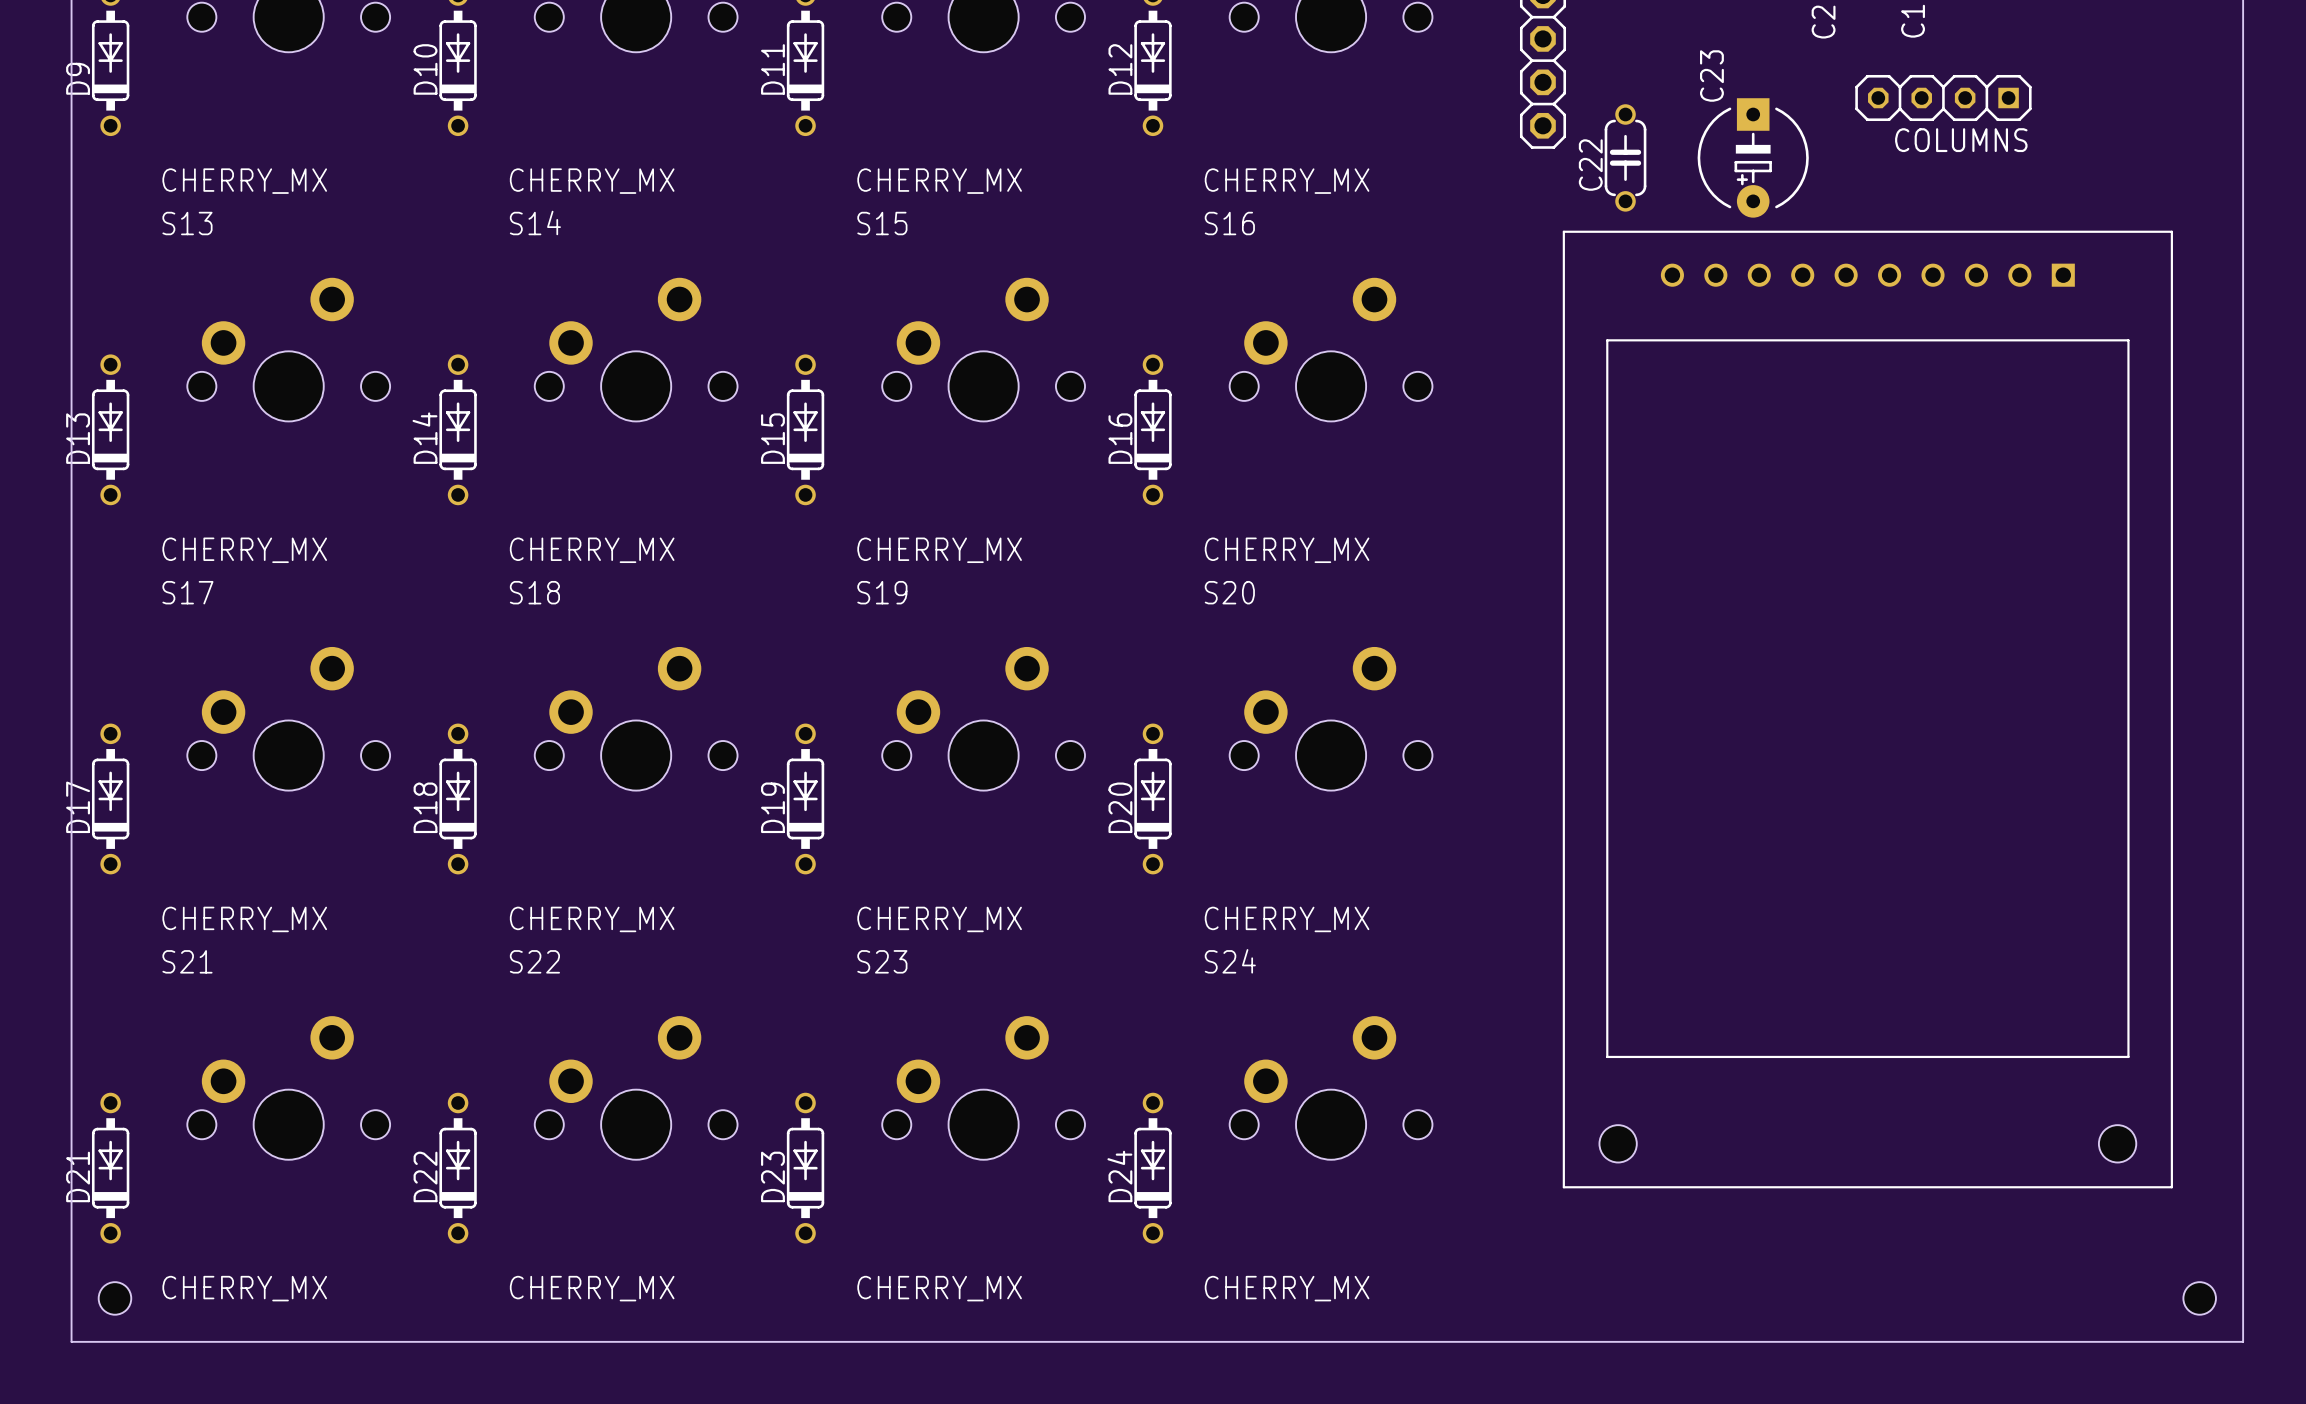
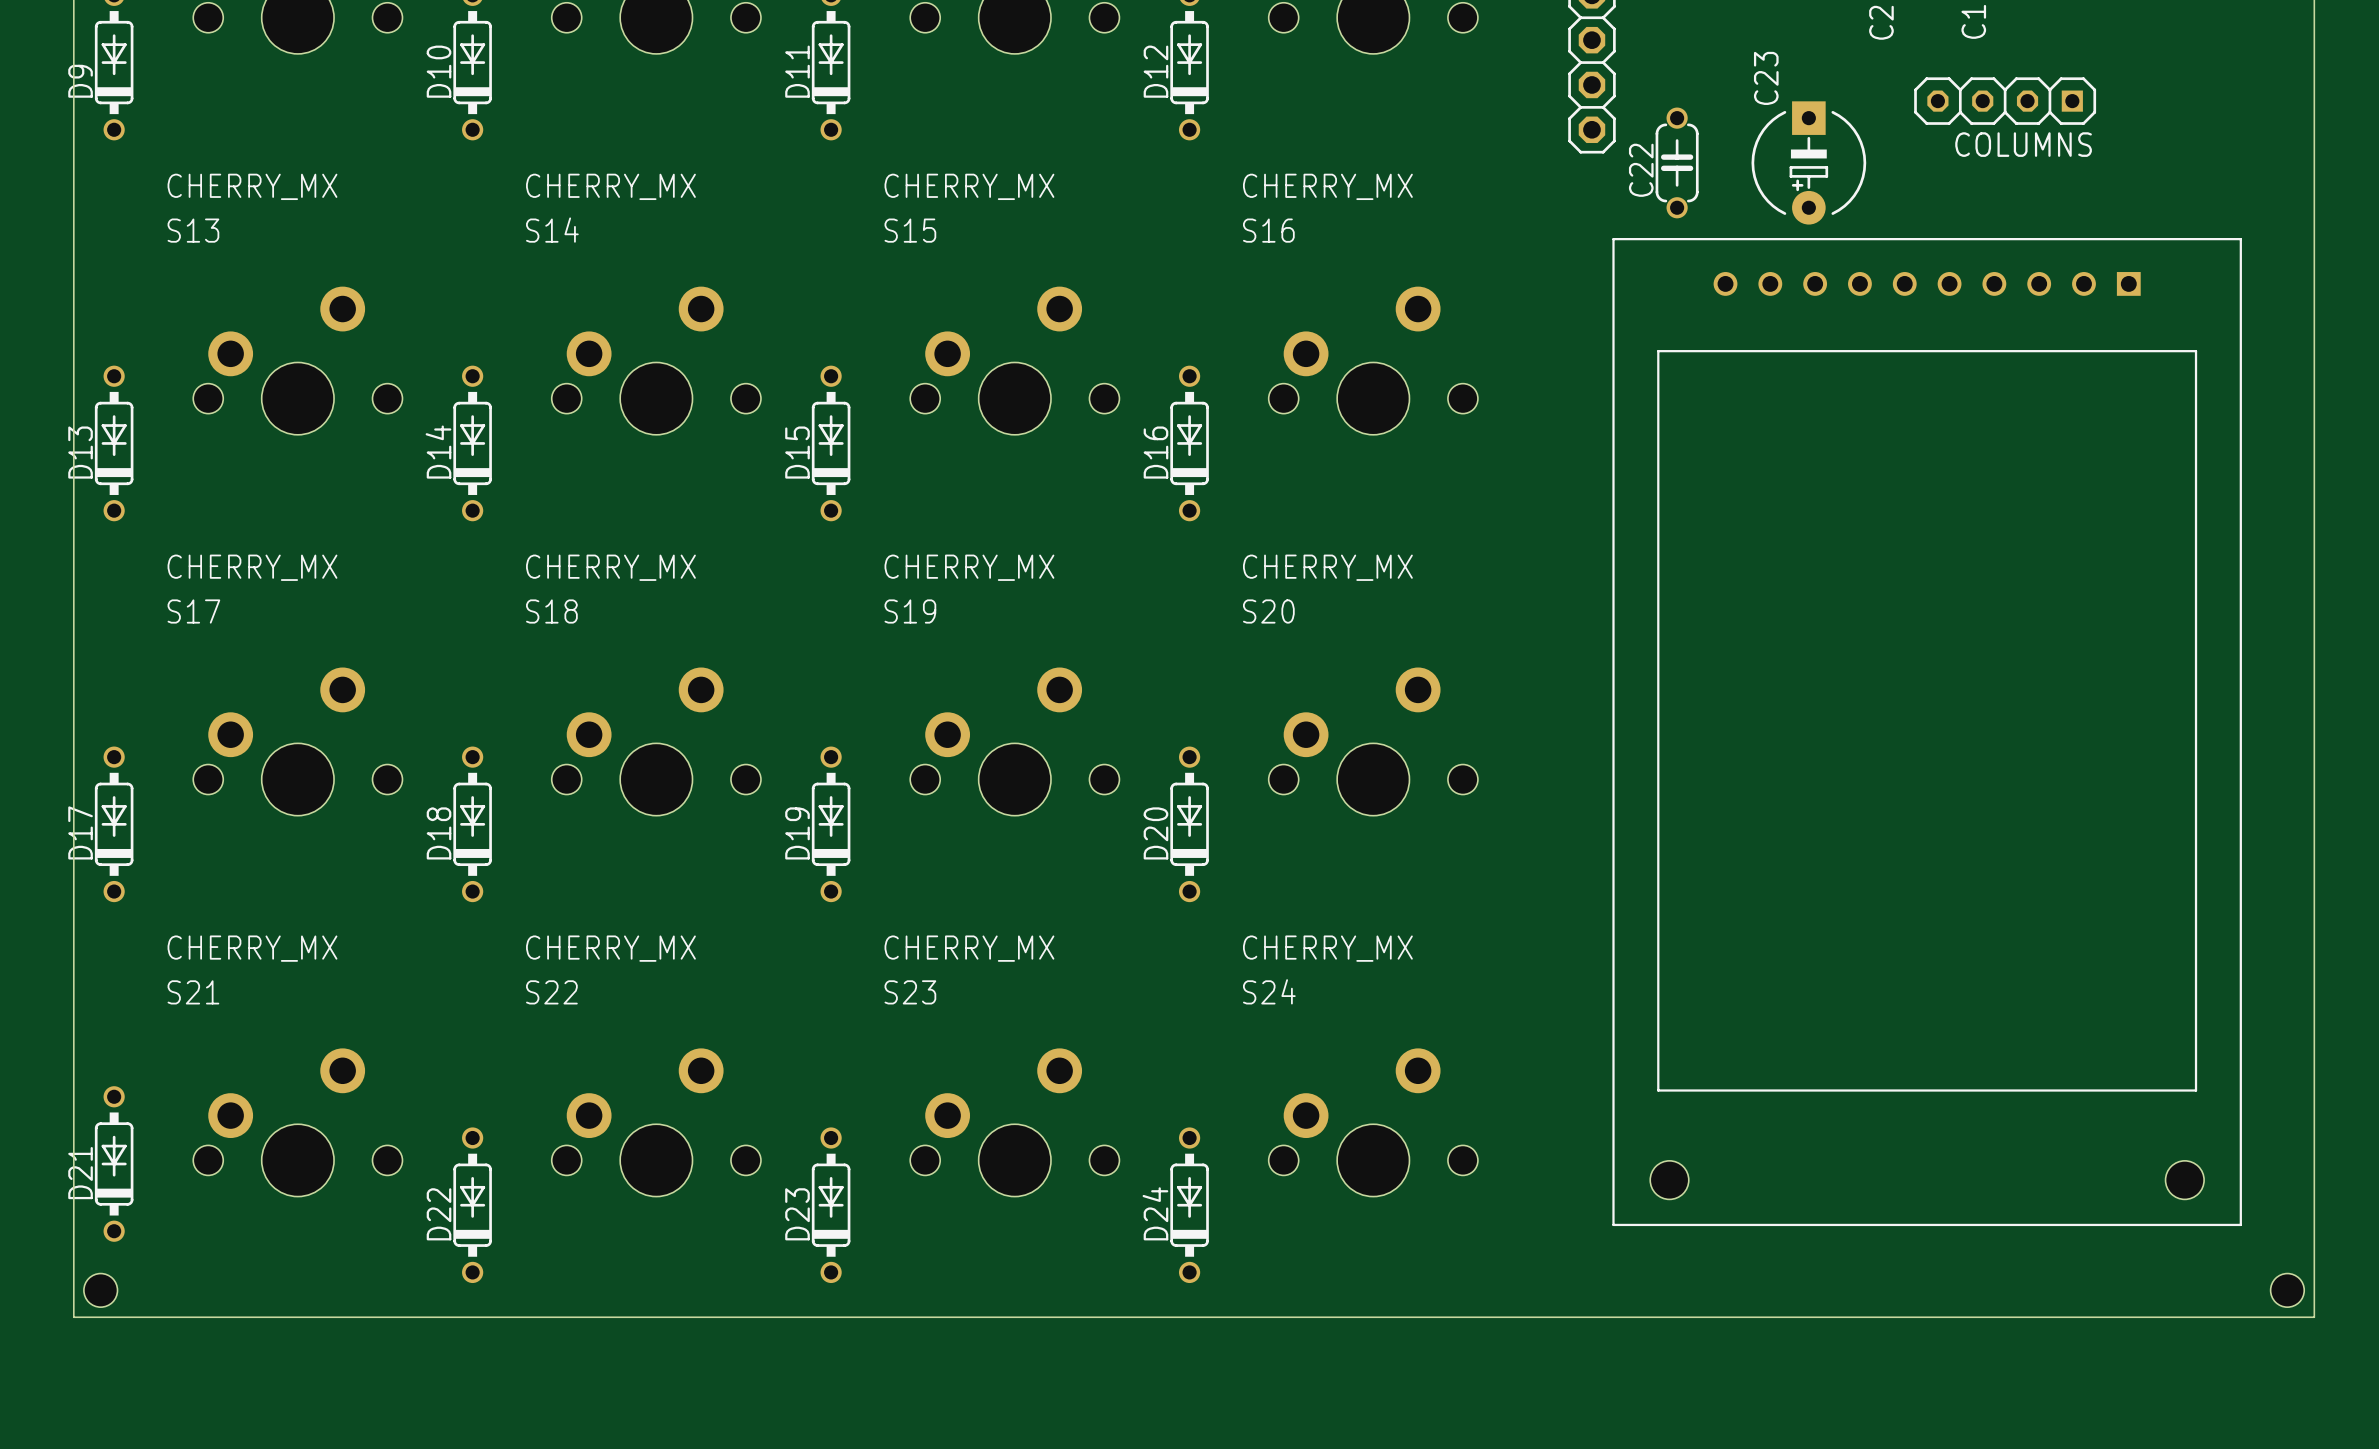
D21 position: (110, 1168) -> (114, 1164)
board edge: (71, 1276) (71, 1341) (2243, 1341) (2243, 1276) -> (73, 1317) (2314, 1317)
S21 value: CHERRY_MX (244, 1288) -> none
S22 value: CHERRY_MX (592, 1288) -> none
S23 value: CHERRY_MX (939, 1288) -> none
S24 value: CHERRY_MX (1287, 1288) -> none
hole position: (114, 1298) -> (100, 1290)
hole position: (2199, 1298) -> (2287, 1290)

